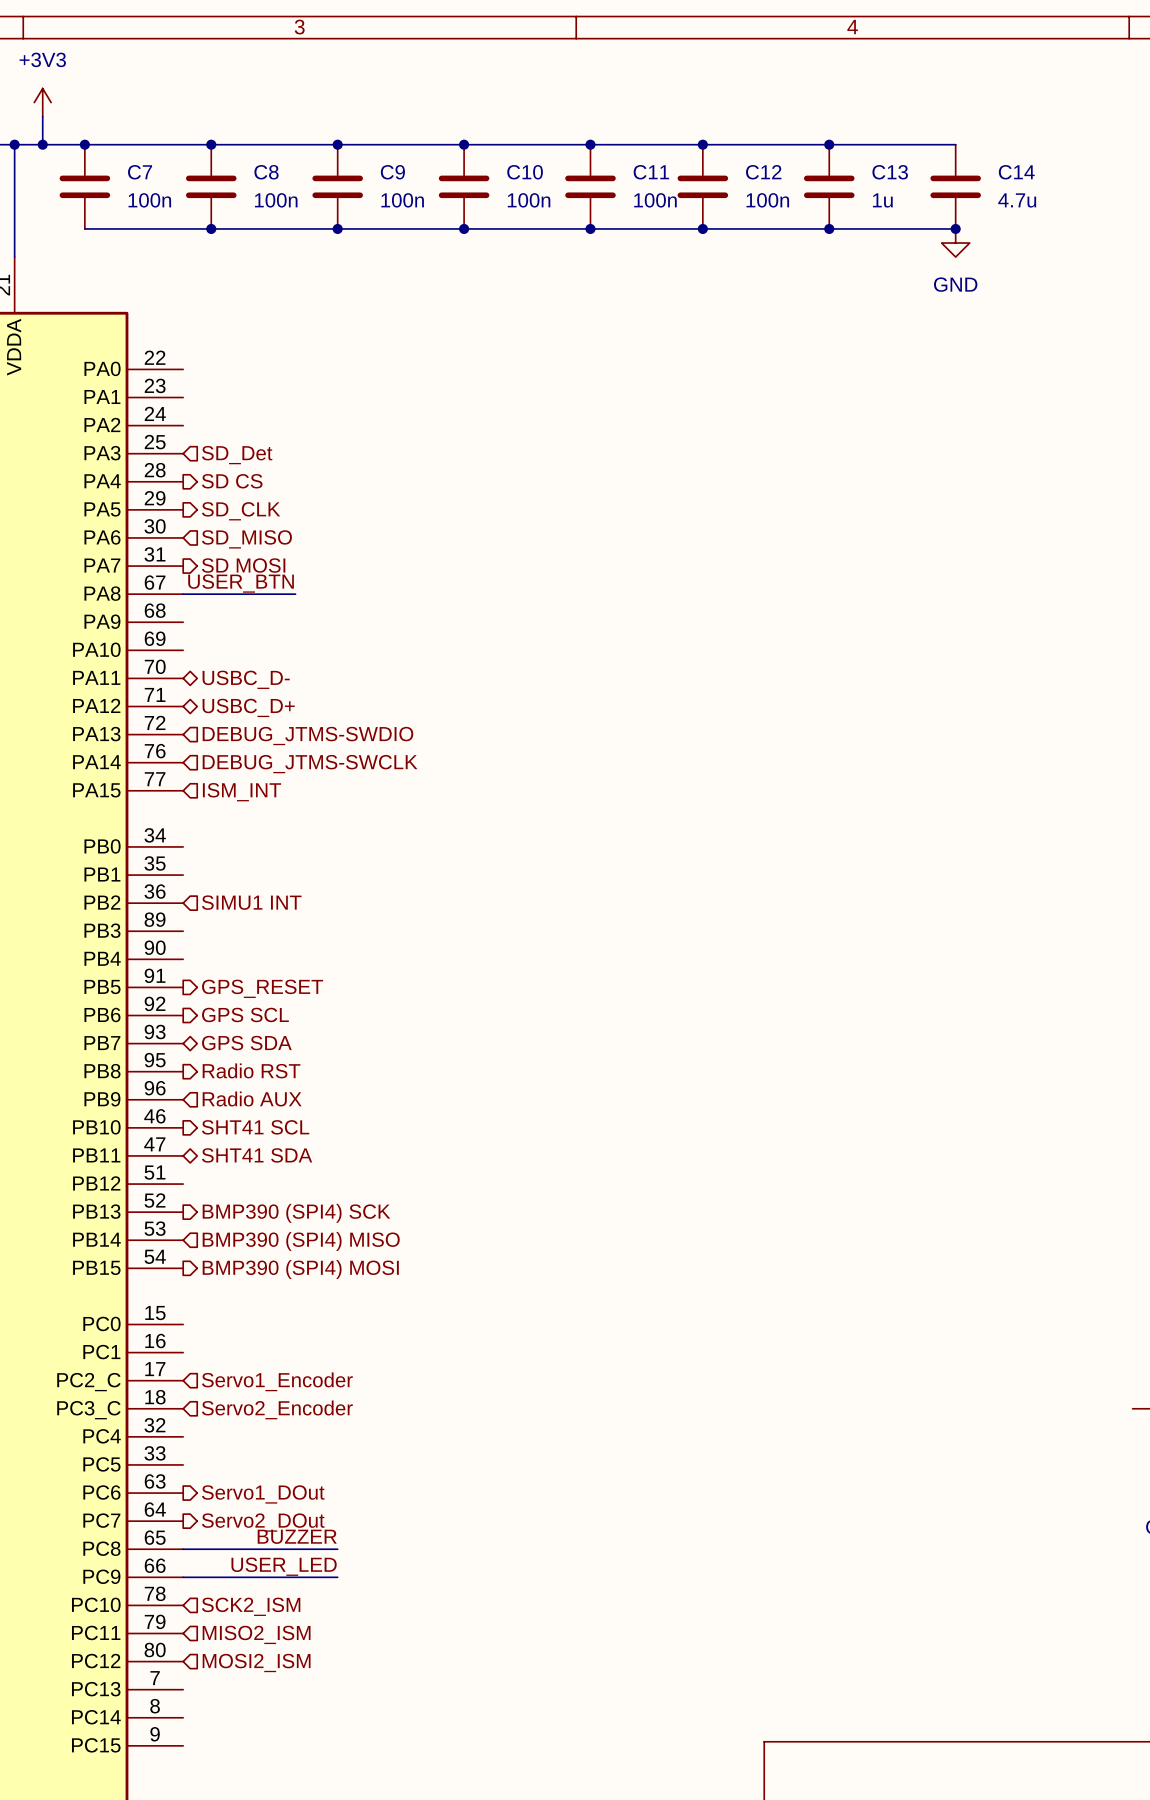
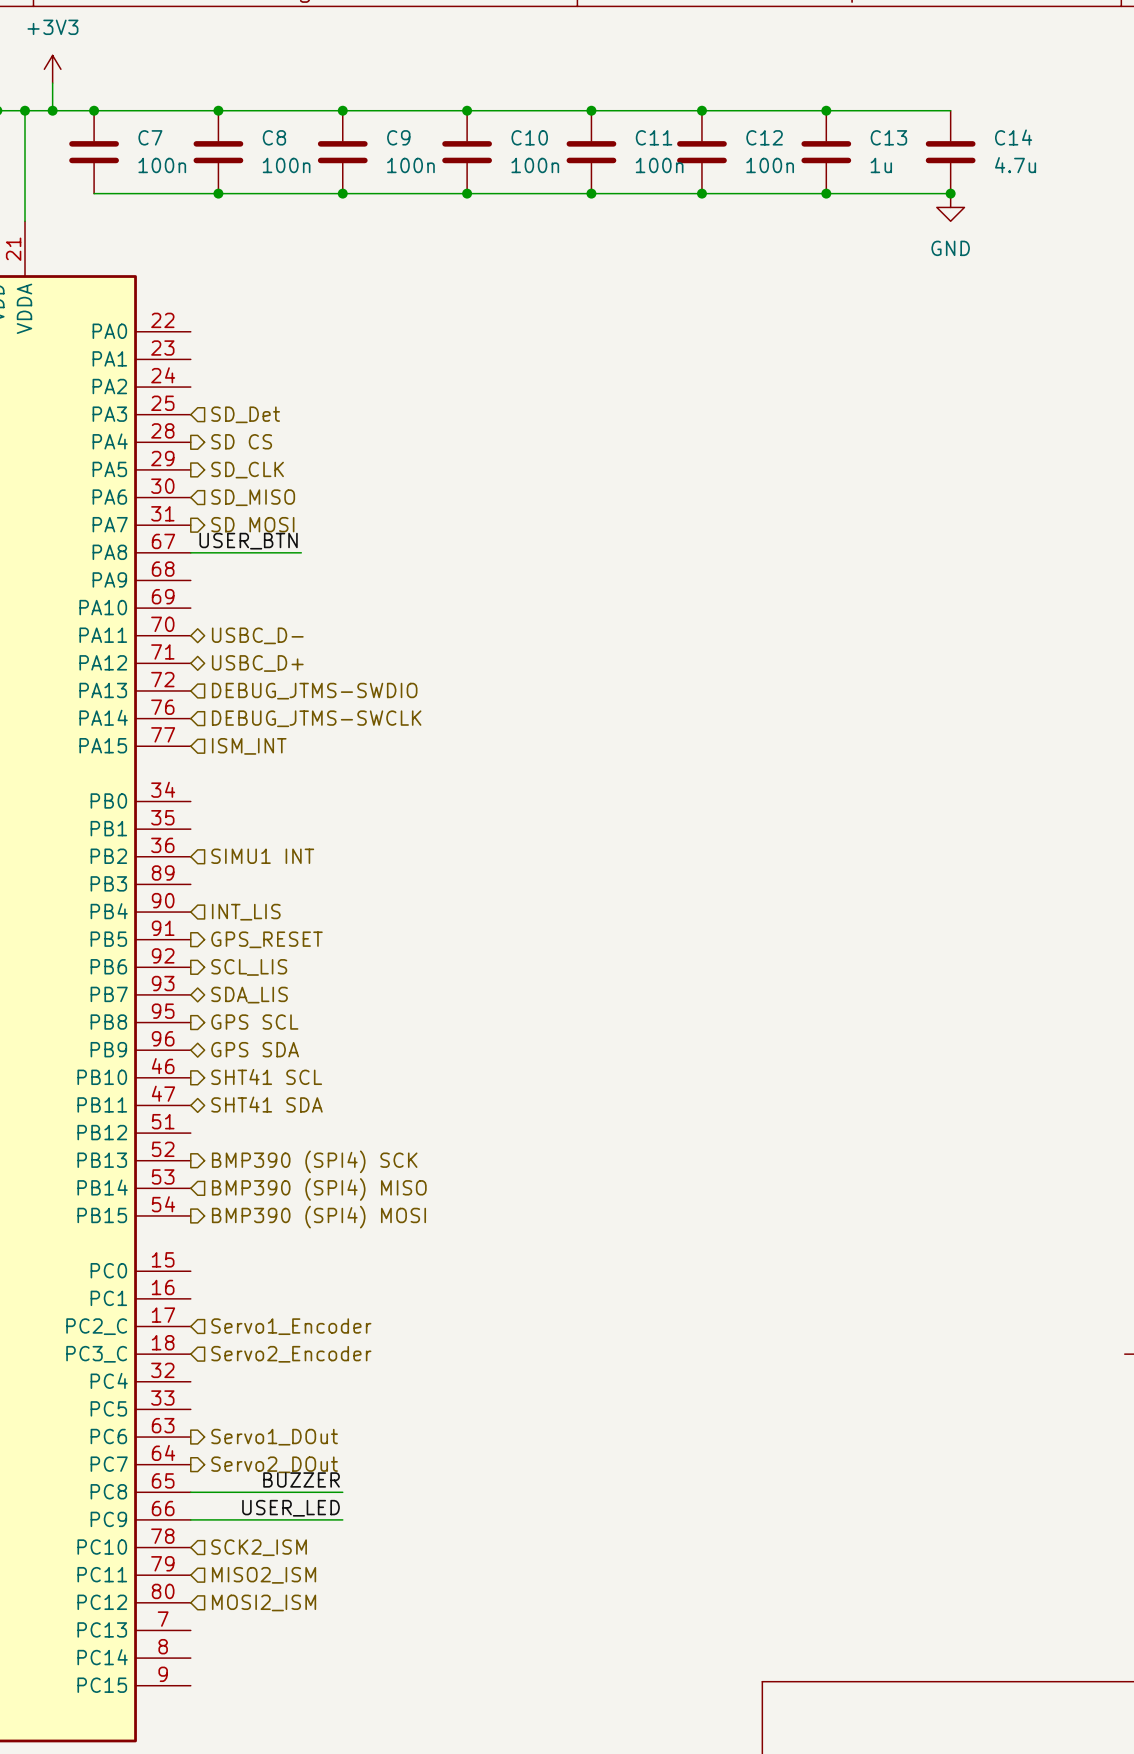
hierarchical label: none -> INT_LIS (246, 912)
hierarchical label: GPS SCL (245, 1014) -> SCL_LIS (249, 967)
hierarchical label: GPS SDA (246, 1043) -> SDA_LIS (249, 995)
hierarchical label: Radio RST (251, 1070) -> GPS SCL (254, 1022)
hierarchical label shape: input (252, 1098) -> bidirectional (255, 1049)
hierarchical label: Radio AUX (252, 1098) -> GPS SDA (255, 1049)

